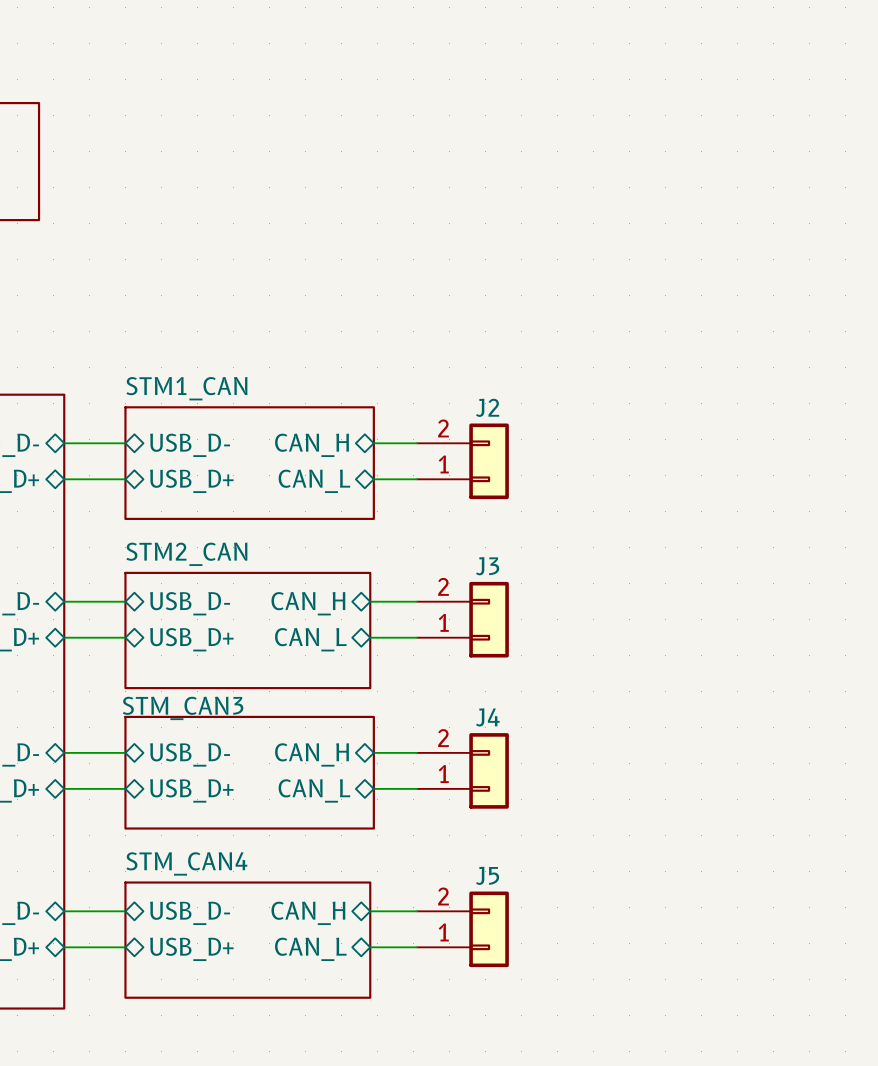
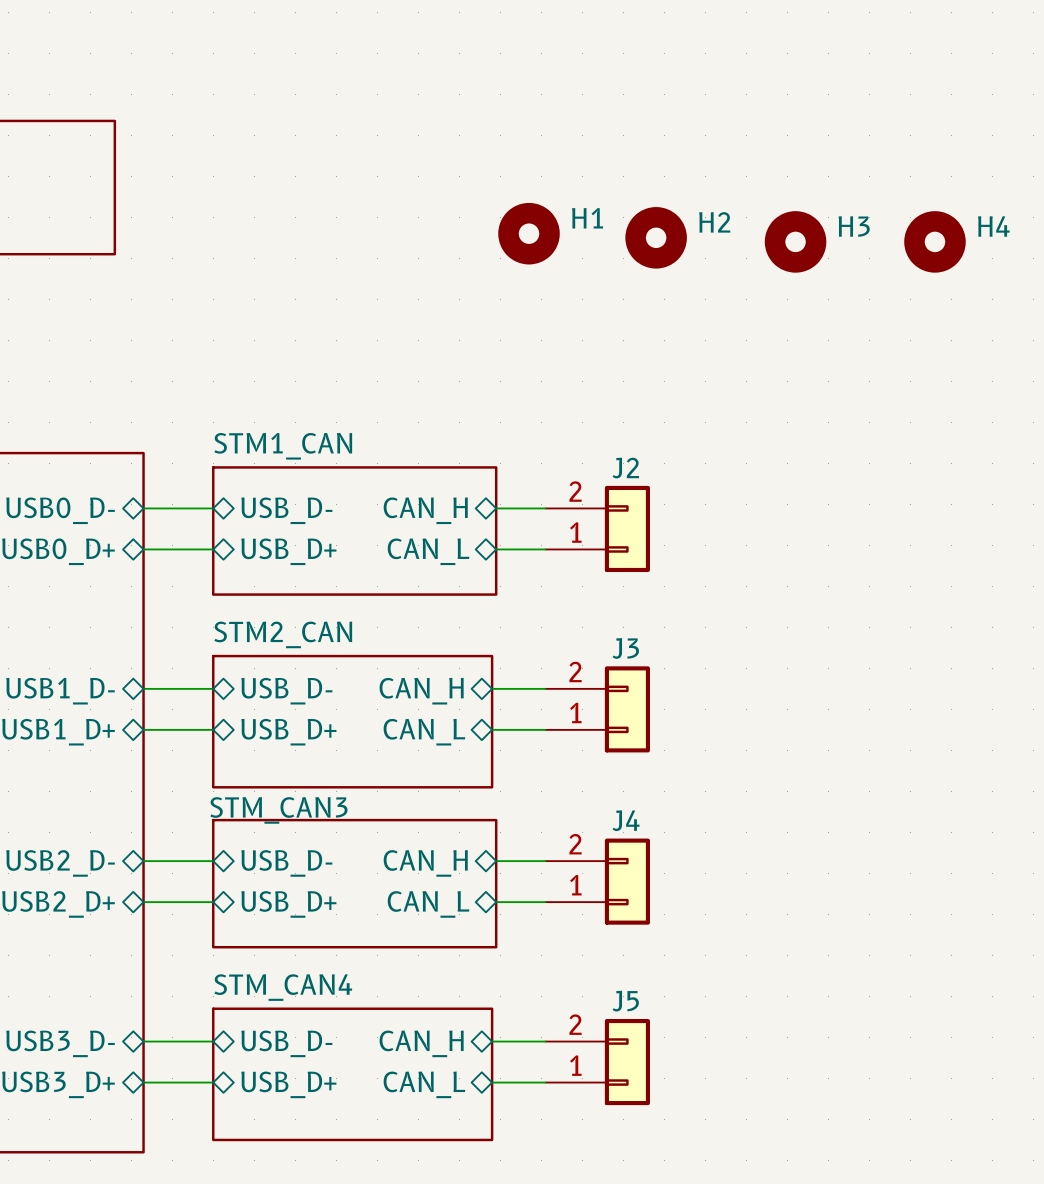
H1: none -> (529, 233)
H2: none -> (656, 237)
H3: none -> (795, 241)
H4: none -> (934, 241)

